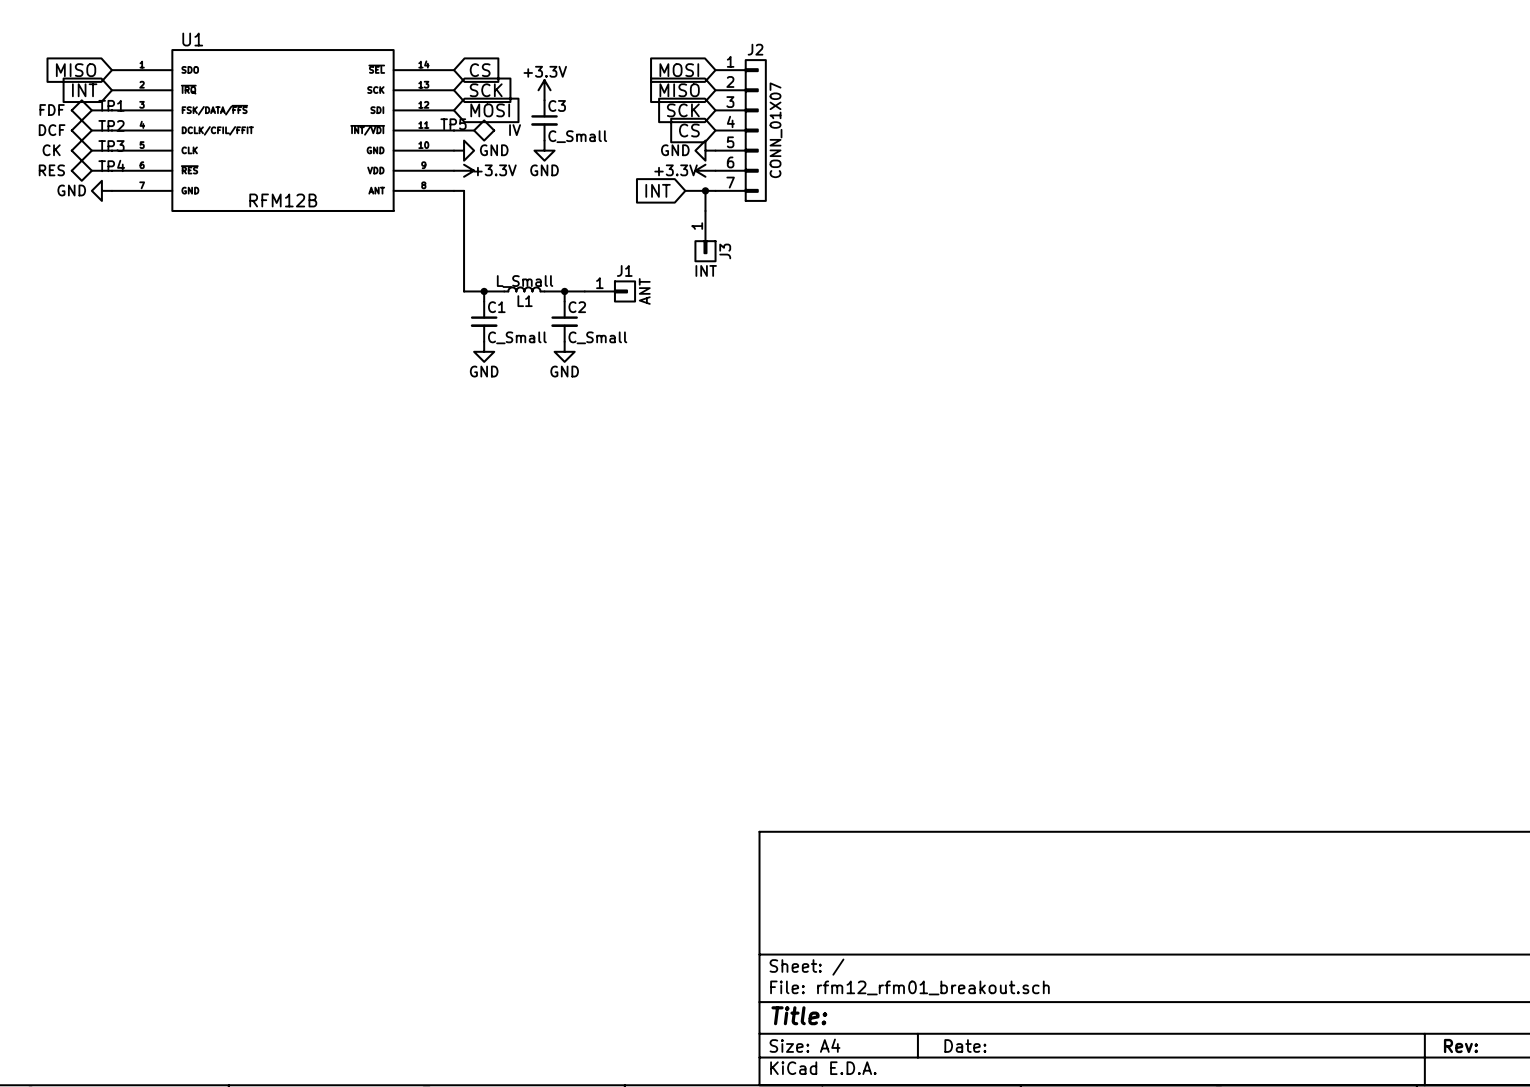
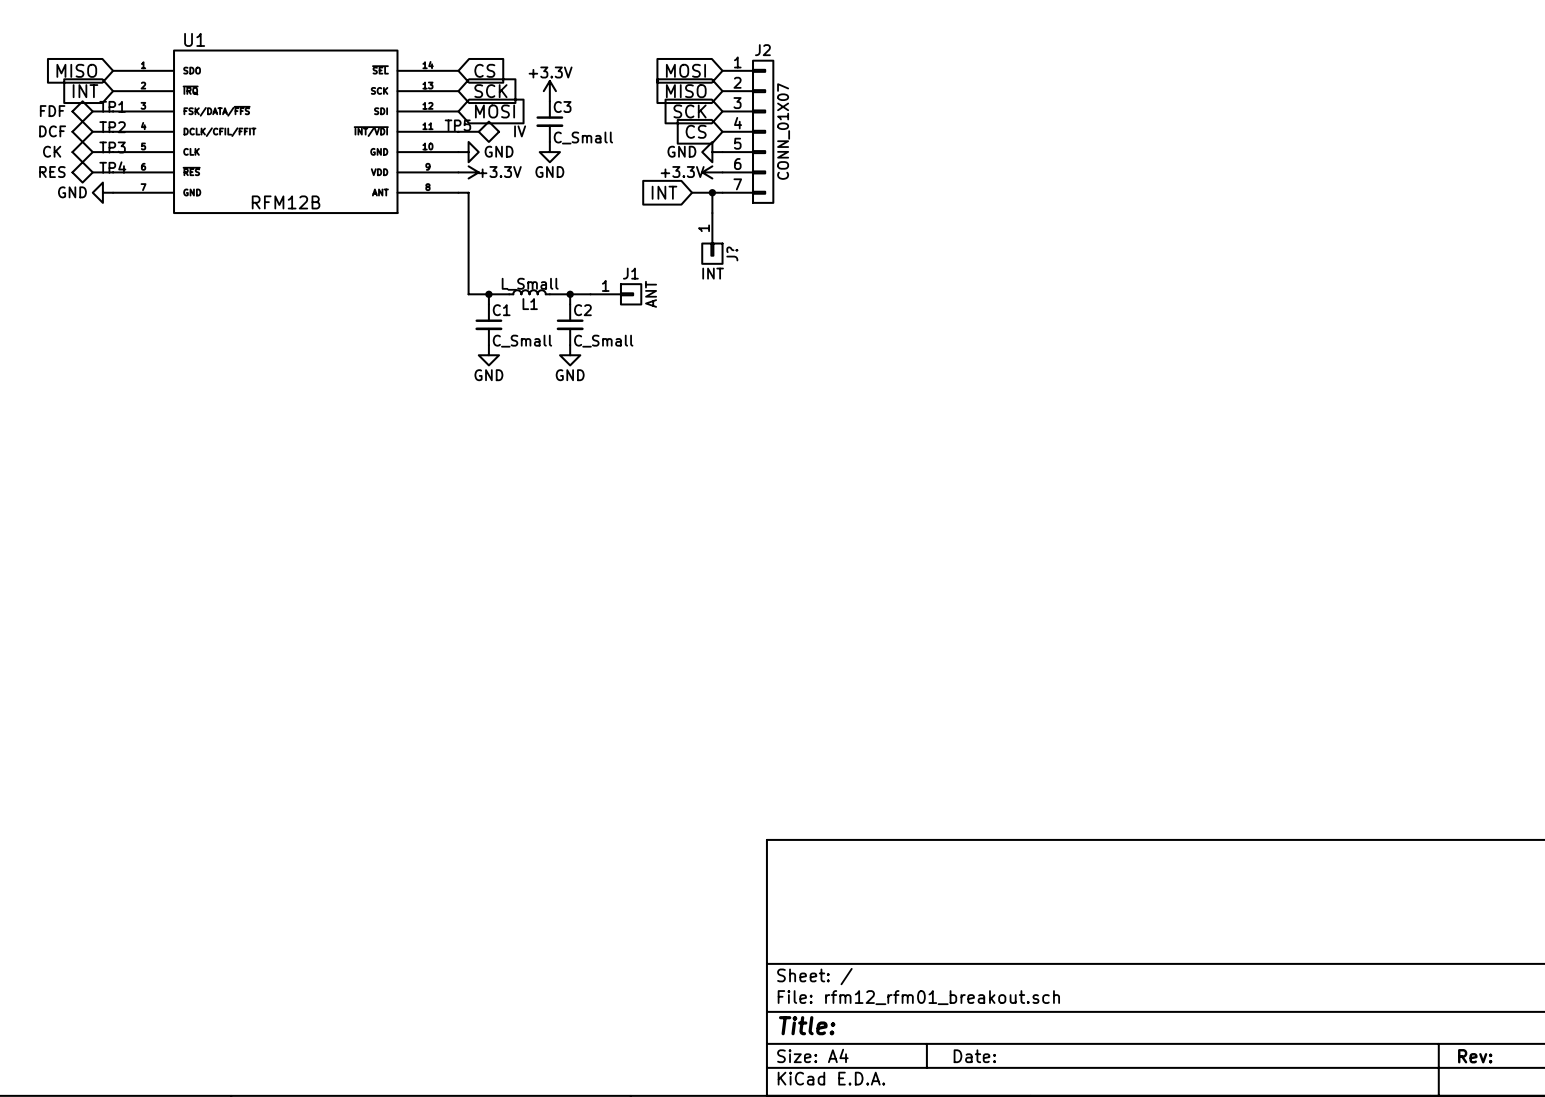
J3 name: J3 (725, 251) -> J? (732, 253)

